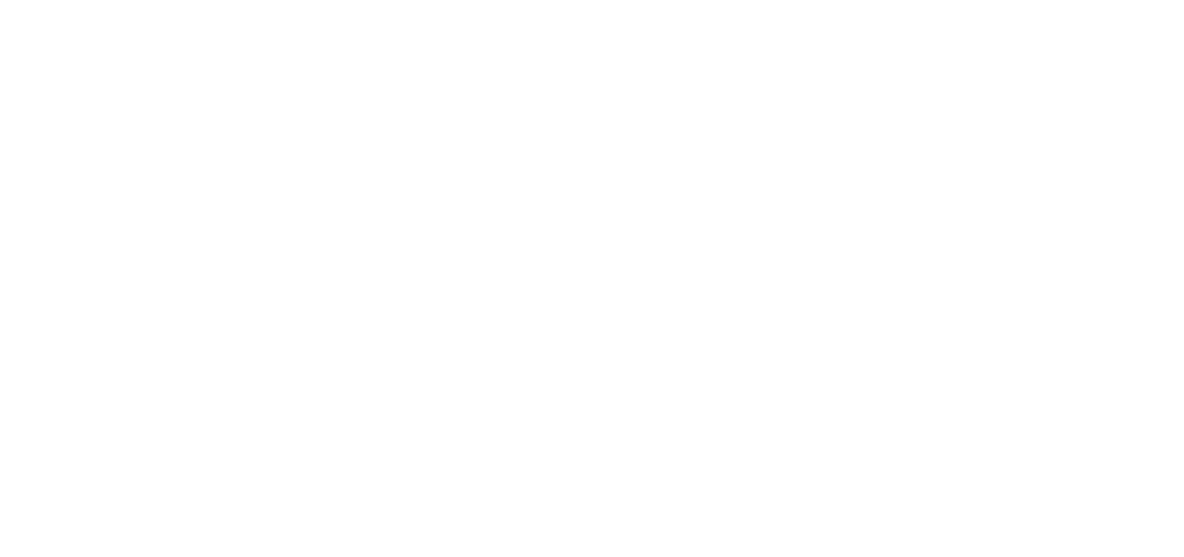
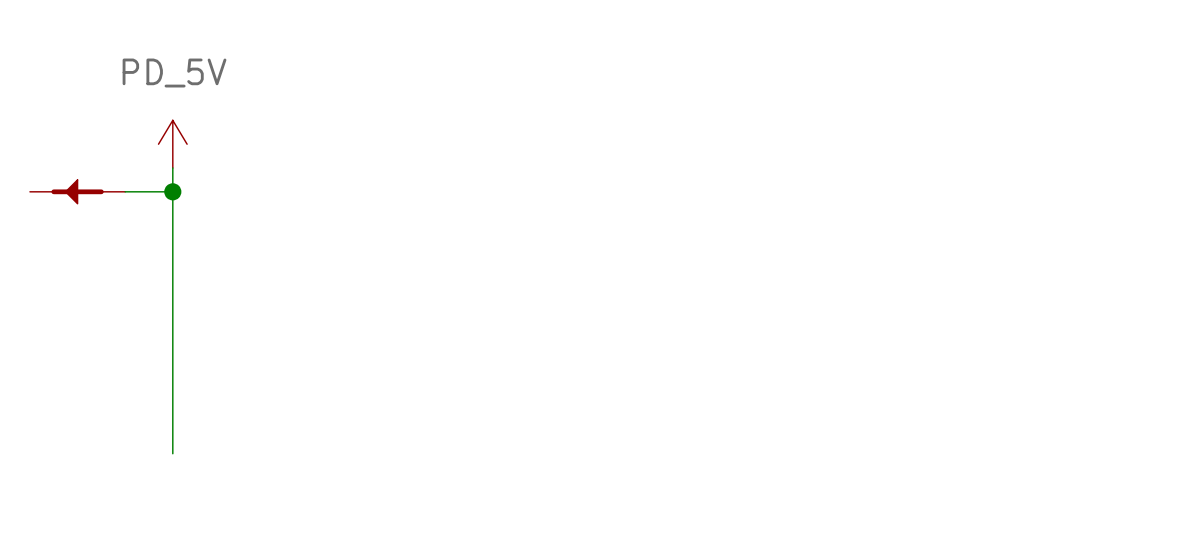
power symbol: none -> PD_5V (172, 144)
wire: none -> (172, 168) (172, 453)
part: none -> (77, 191)
wire: none -> (125, 191) (172, 191)
junction: none -> (172, 191)

